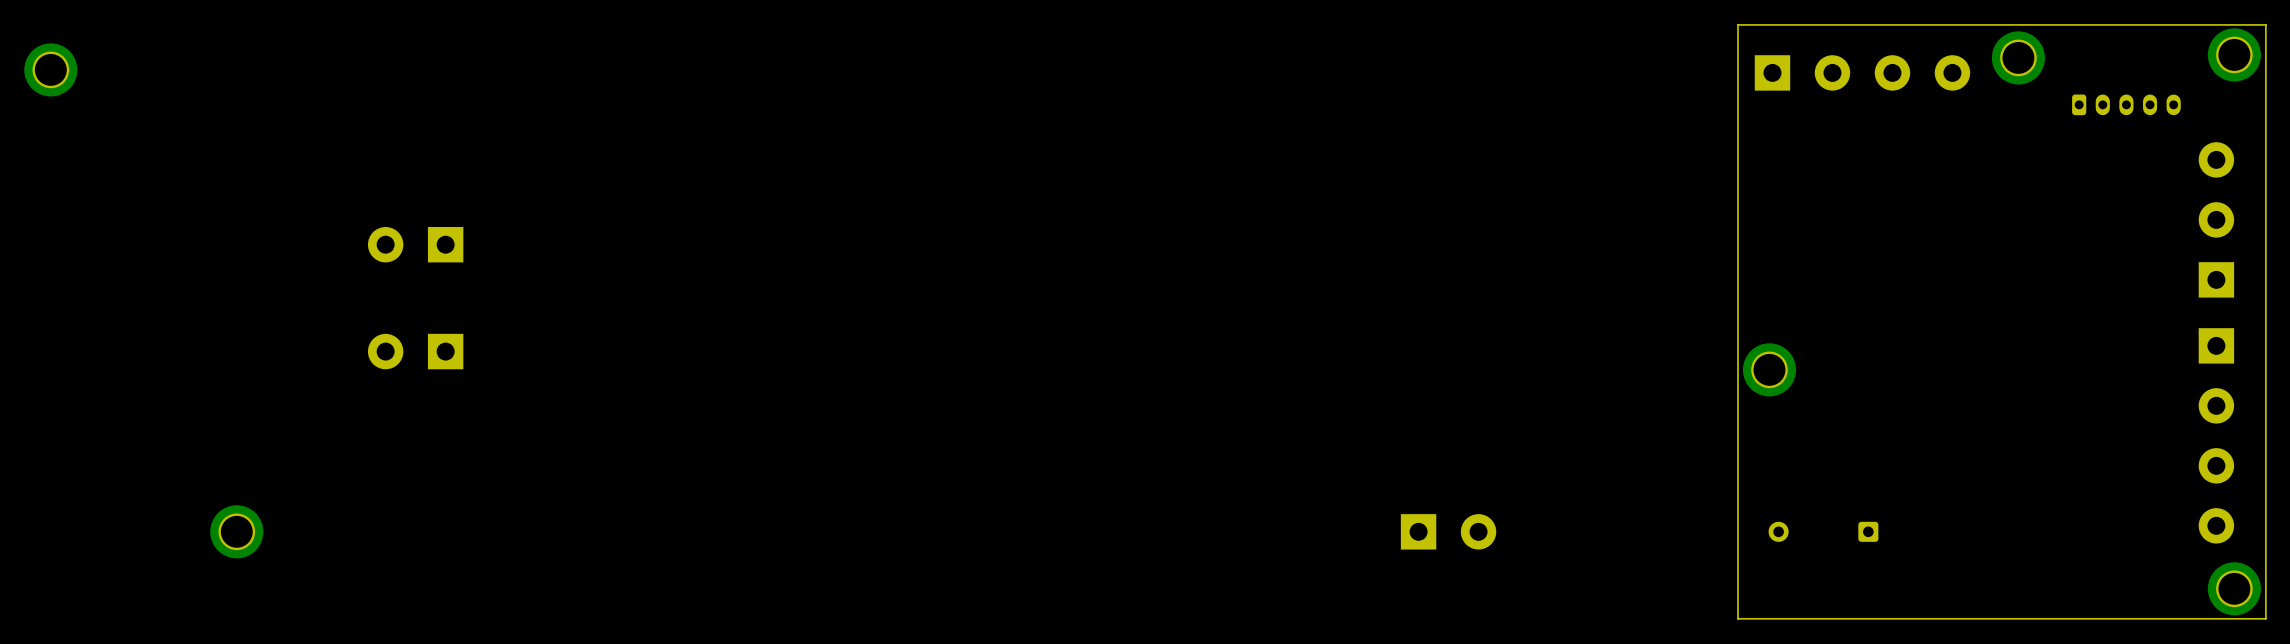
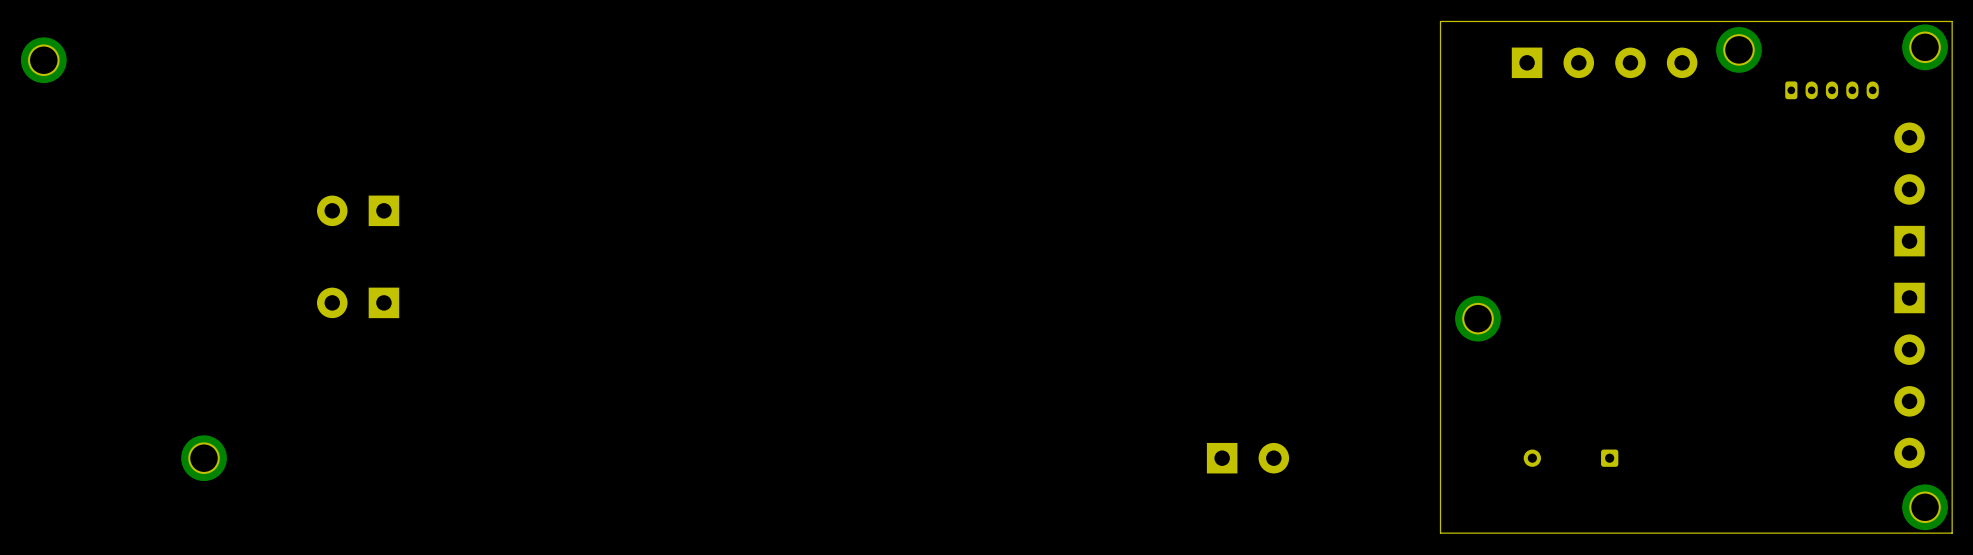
board edge: (1737, 24) (1737, 618) -> (1497, 21) (1440, 21) (1440, 533) (1497, 533)
part position: (1769, 369) -> (1477, 318)

